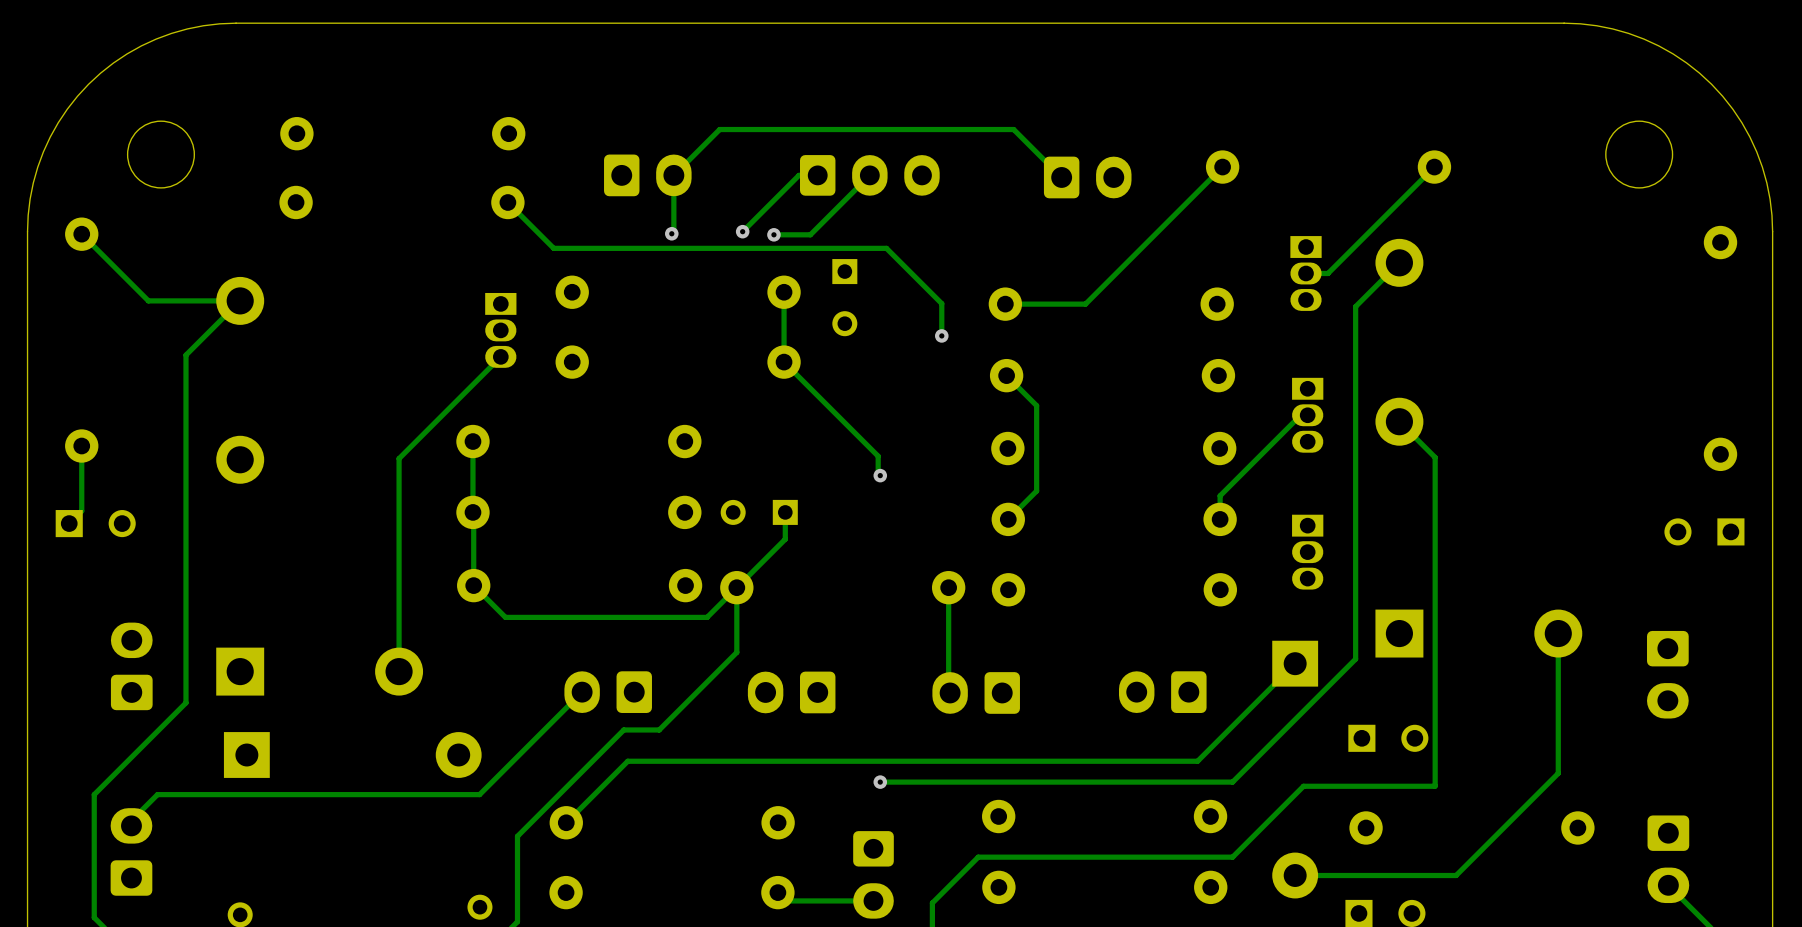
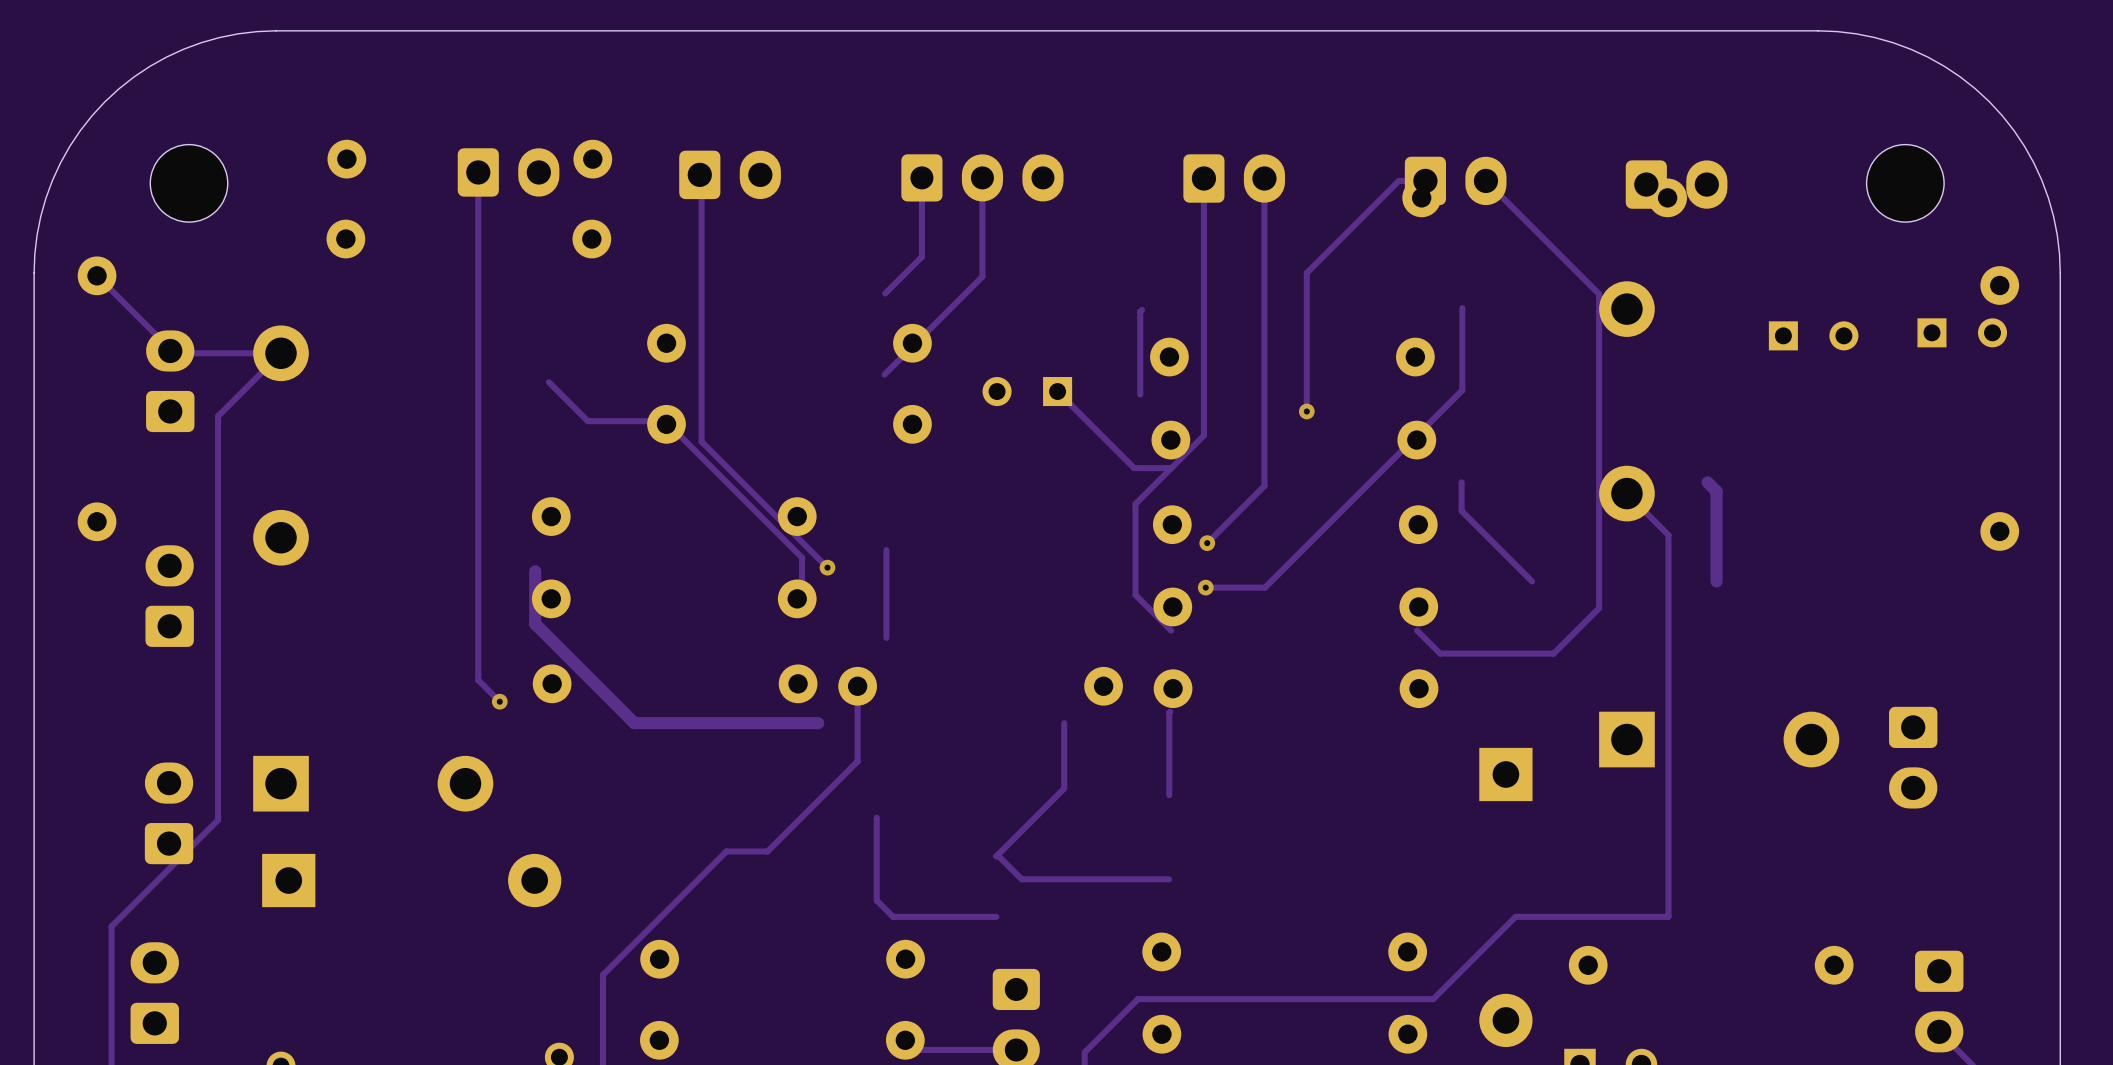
track: none -> (478, 172) (478, 680) (499, 701)
part: none -> (508, 172)
track: none -> (699, 174) (701, 176) (701, 441) (827, 567)
track: none -> (921, 177) (921, 256) (885, 293)
track: none -> (982, 177) (982, 276) (884, 374)
track: none -> (1203, 178) (1203, 435) (1135, 503) (1135, 595) (1171, 630)
track: none -> (1264, 178) (1264, 485) (1207, 543)
track: none -> (1425, 180) (1398, 180) (1306, 272) (1306, 411)
part: none -> (1455, 180)
track: none -> (1485, 180) (1599, 294) (1599, 608) (1553, 653) (1440, 653) (1417, 630)
part: none -> (1676, 184)
track: (1222, 167) (1085, 304) (1005, 304) -> none
track: (1434, 167) (1328, 273) (1306, 273) -> none
part position: (647, 175) -> (730, 174)
track: (817, 175) (798, 175) (742, 231) -> none
track: (869, 175) (810, 234) (773, 234) -> none
part position: (869, 175) -> (982, 177)
track: (1061, 177) (1013, 129) (719, 129) (673, 175) (673, 231) (671, 233) -> none
part position: (1087, 177) -> (1234, 178)
track: (507, 202) (553, 248) (886, 248) (941, 303) (941, 335) -> none
via: (742, 231) -> none
via: (671, 233) -> none
via: (773, 234) -> none
track: none -> (1462, 308) (1462, 390) (1265, 587) (1205, 587)
track: (1399, 262) (1355, 306) (1355, 659) (1232, 782) (880, 782) -> none
track: none -> (1142, 309) (1140, 311) (1140, 394)
part: (1306, 273) -> none
part: none -> (1962, 332)
part: none -> (1813, 335)
track: (784, 292) (784, 362) (878, 456) (878, 473) (880, 475) -> none
part rotation: 0° (844, 297) -> 90° clockwise (1027, 391)
part position: (844, 297) -> (1027, 391)
part: none -> (170, 381)
track: none -> (548, 382) (587, 421) (665, 421) (802, 557) (802, 586)
part: (500, 330) -> none
track: none -> (1057, 391) (1134, 468) (1171, 468)
via: (941, 335) -> none
via: none -> (1306, 411)
track: (500, 356) (399, 458) (399, 671) -> none
track: (1006, 375) (1036, 405) (1036, 491) (1008, 519) -> none
track: none -> (1461, 482) (1461, 511) (1532, 581)
track: none -> (1707, 482) (1716, 491) (1716, 581)
track: (1307, 415) (1300, 415) (1220, 495) (1220, 519) -> none
part: (1307, 415) -> none
track: (472, 441) (473, 585) (505, 617) (707, 617) (785, 539) (785, 512) -> none
track: (81, 446) (81, 511) (69, 523) -> none
via: none -> (1207, 543)
track: none -> (886, 550) (886, 637)
via: (880, 475) -> none
via: none -> (827, 567)
track: none -> (535, 571) (535, 623) (634, 723) (818, 723)
via: none -> (1205, 587)
part: none -> (169, 596)
part: (759, 512) -> none
part: (95, 523) -> none
part: (1704, 531) -> none
part: (1307, 552) -> none
track: (948, 587) (950, 692) -> none
via: none -> (499, 701)
track: none -> (1170, 711) (1169, 795)
track: none -> (1064, 723) (1064, 788) (996, 856) (998, 856) (1021, 879) (1169, 879)
track: (1558, 633) (1558, 773) (1456, 875) (1295, 875) -> none
track: (1295, 663) (1197, 761) (627, 761) (566, 822) -> none
part position: (131, 666) -> (169, 813)
part position: (1667, 674) -> (1913, 757)
track: (582, 692) (479, 794) (157, 794) (131, 820) -> none
part: (608, 692) -> none
part: (791, 692) -> none
part: (976, 692) -> none
part: (1162, 692) -> none
track: none -> (876, 817) (876, 900) (893, 916) (996, 916)
part: (1388, 738) -> none
via: (880, 782) -> none

